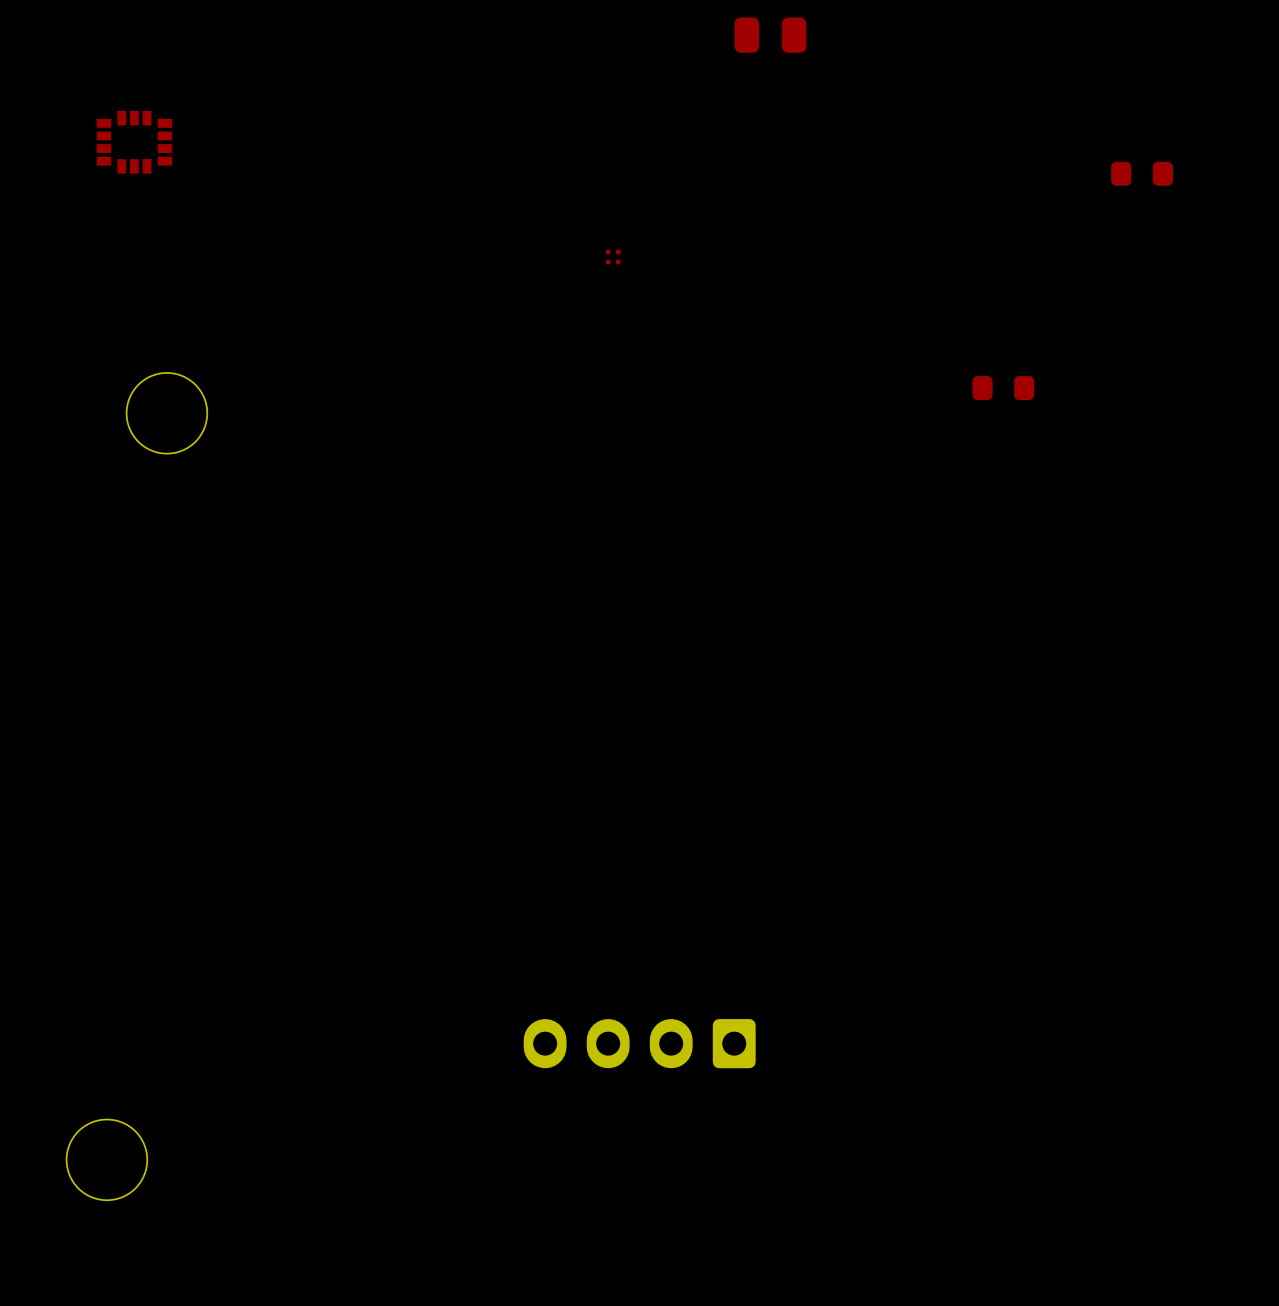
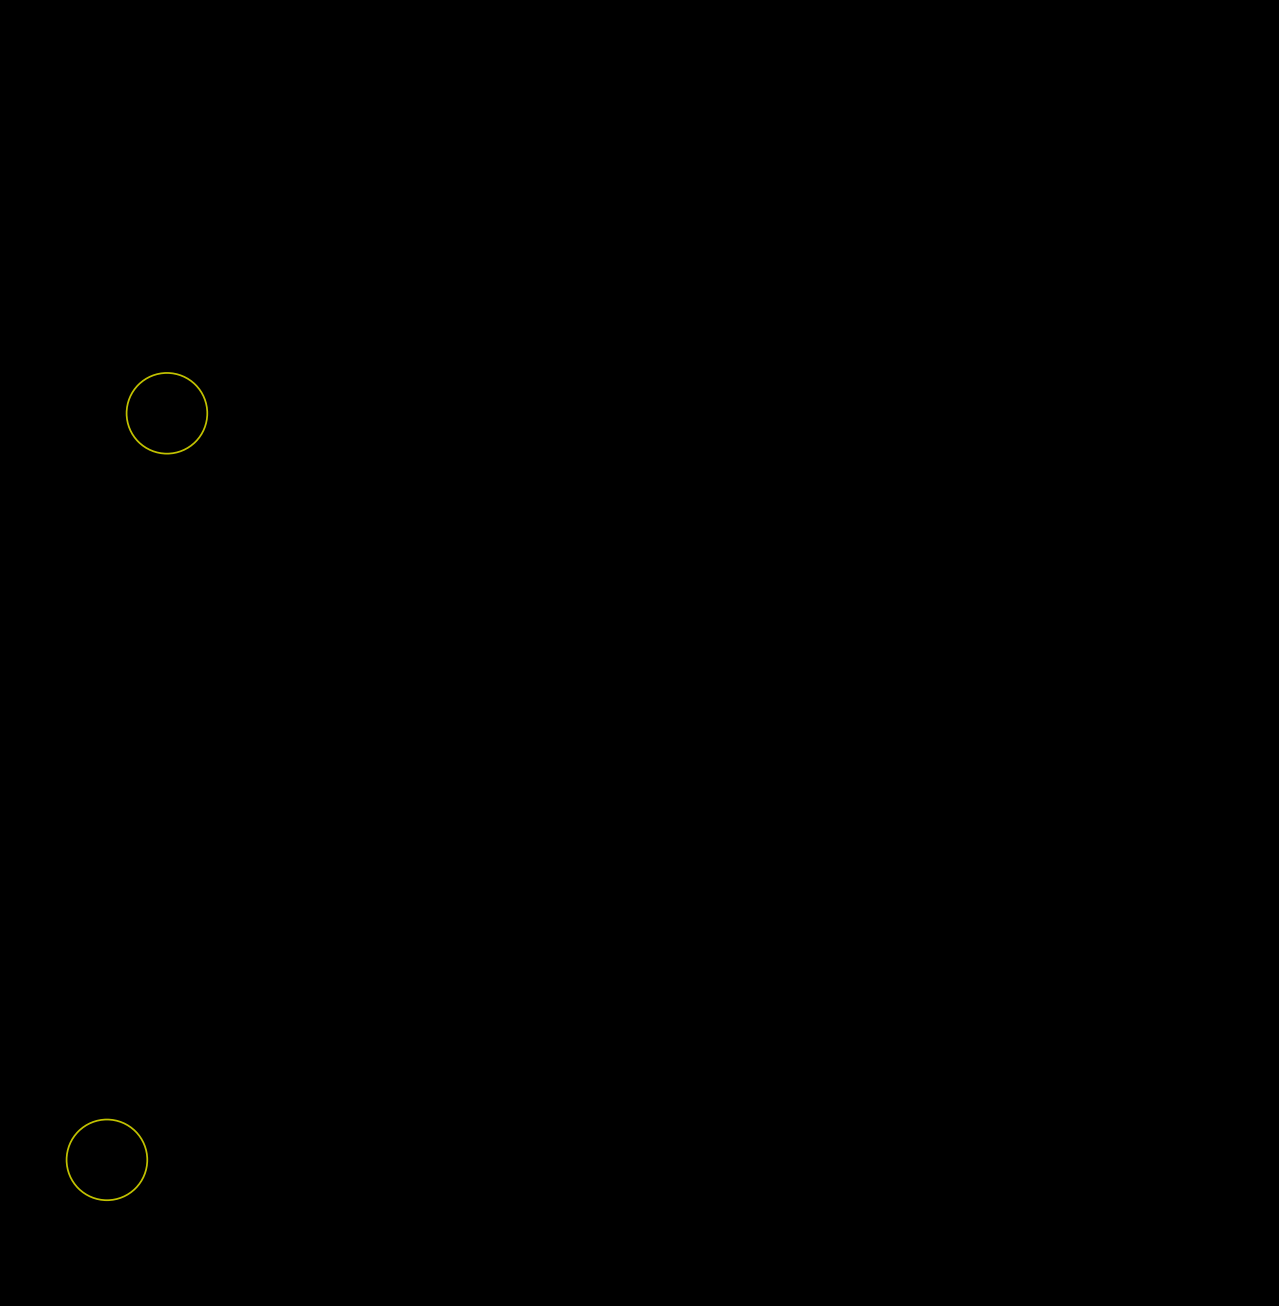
part: (770, 35) -> none
part: (134, 142) -> none
part: (1142, 173) -> none
part: (613, 256) -> none
part: (1003, 388) -> none
part: (639, 1043) -> none

